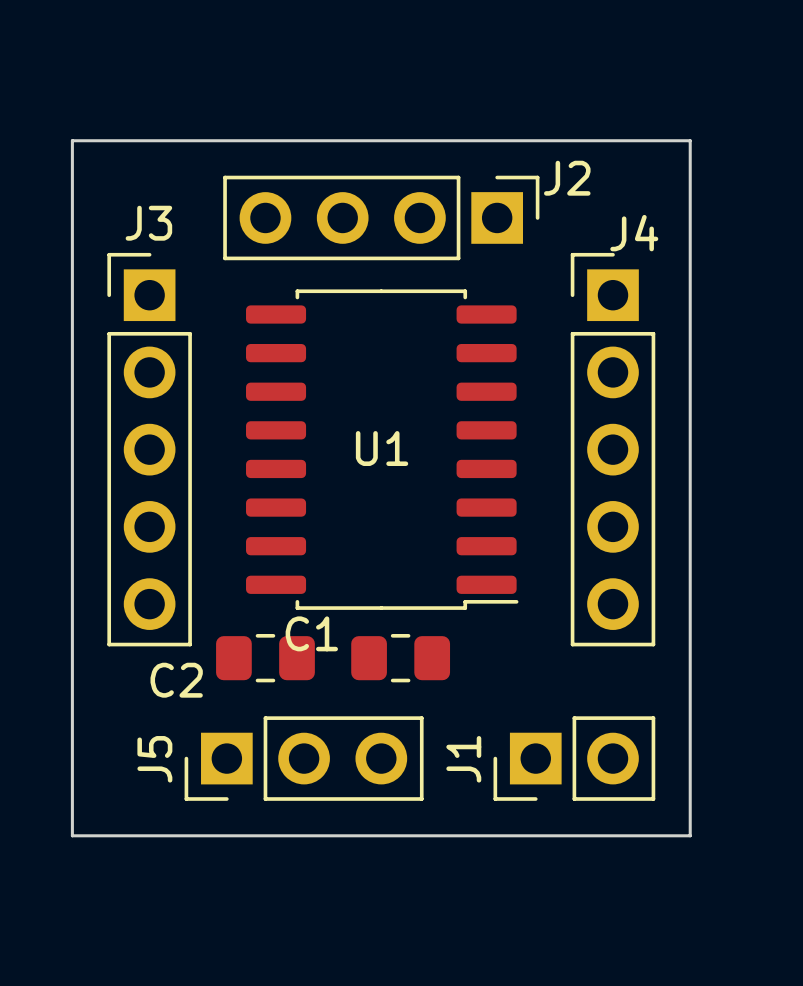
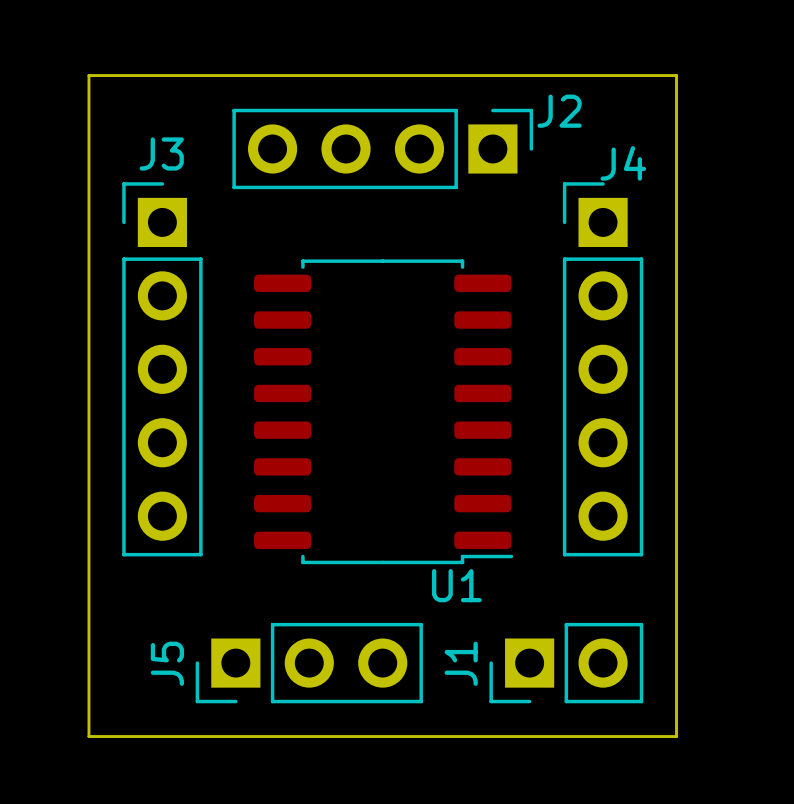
U1 name position: U1 (382, 448) -> U1 (456, 585)
U1 position: (382, 449) -> (383, 411)
C2: (265, 658) -> none
C1: (400, 658) -> none

